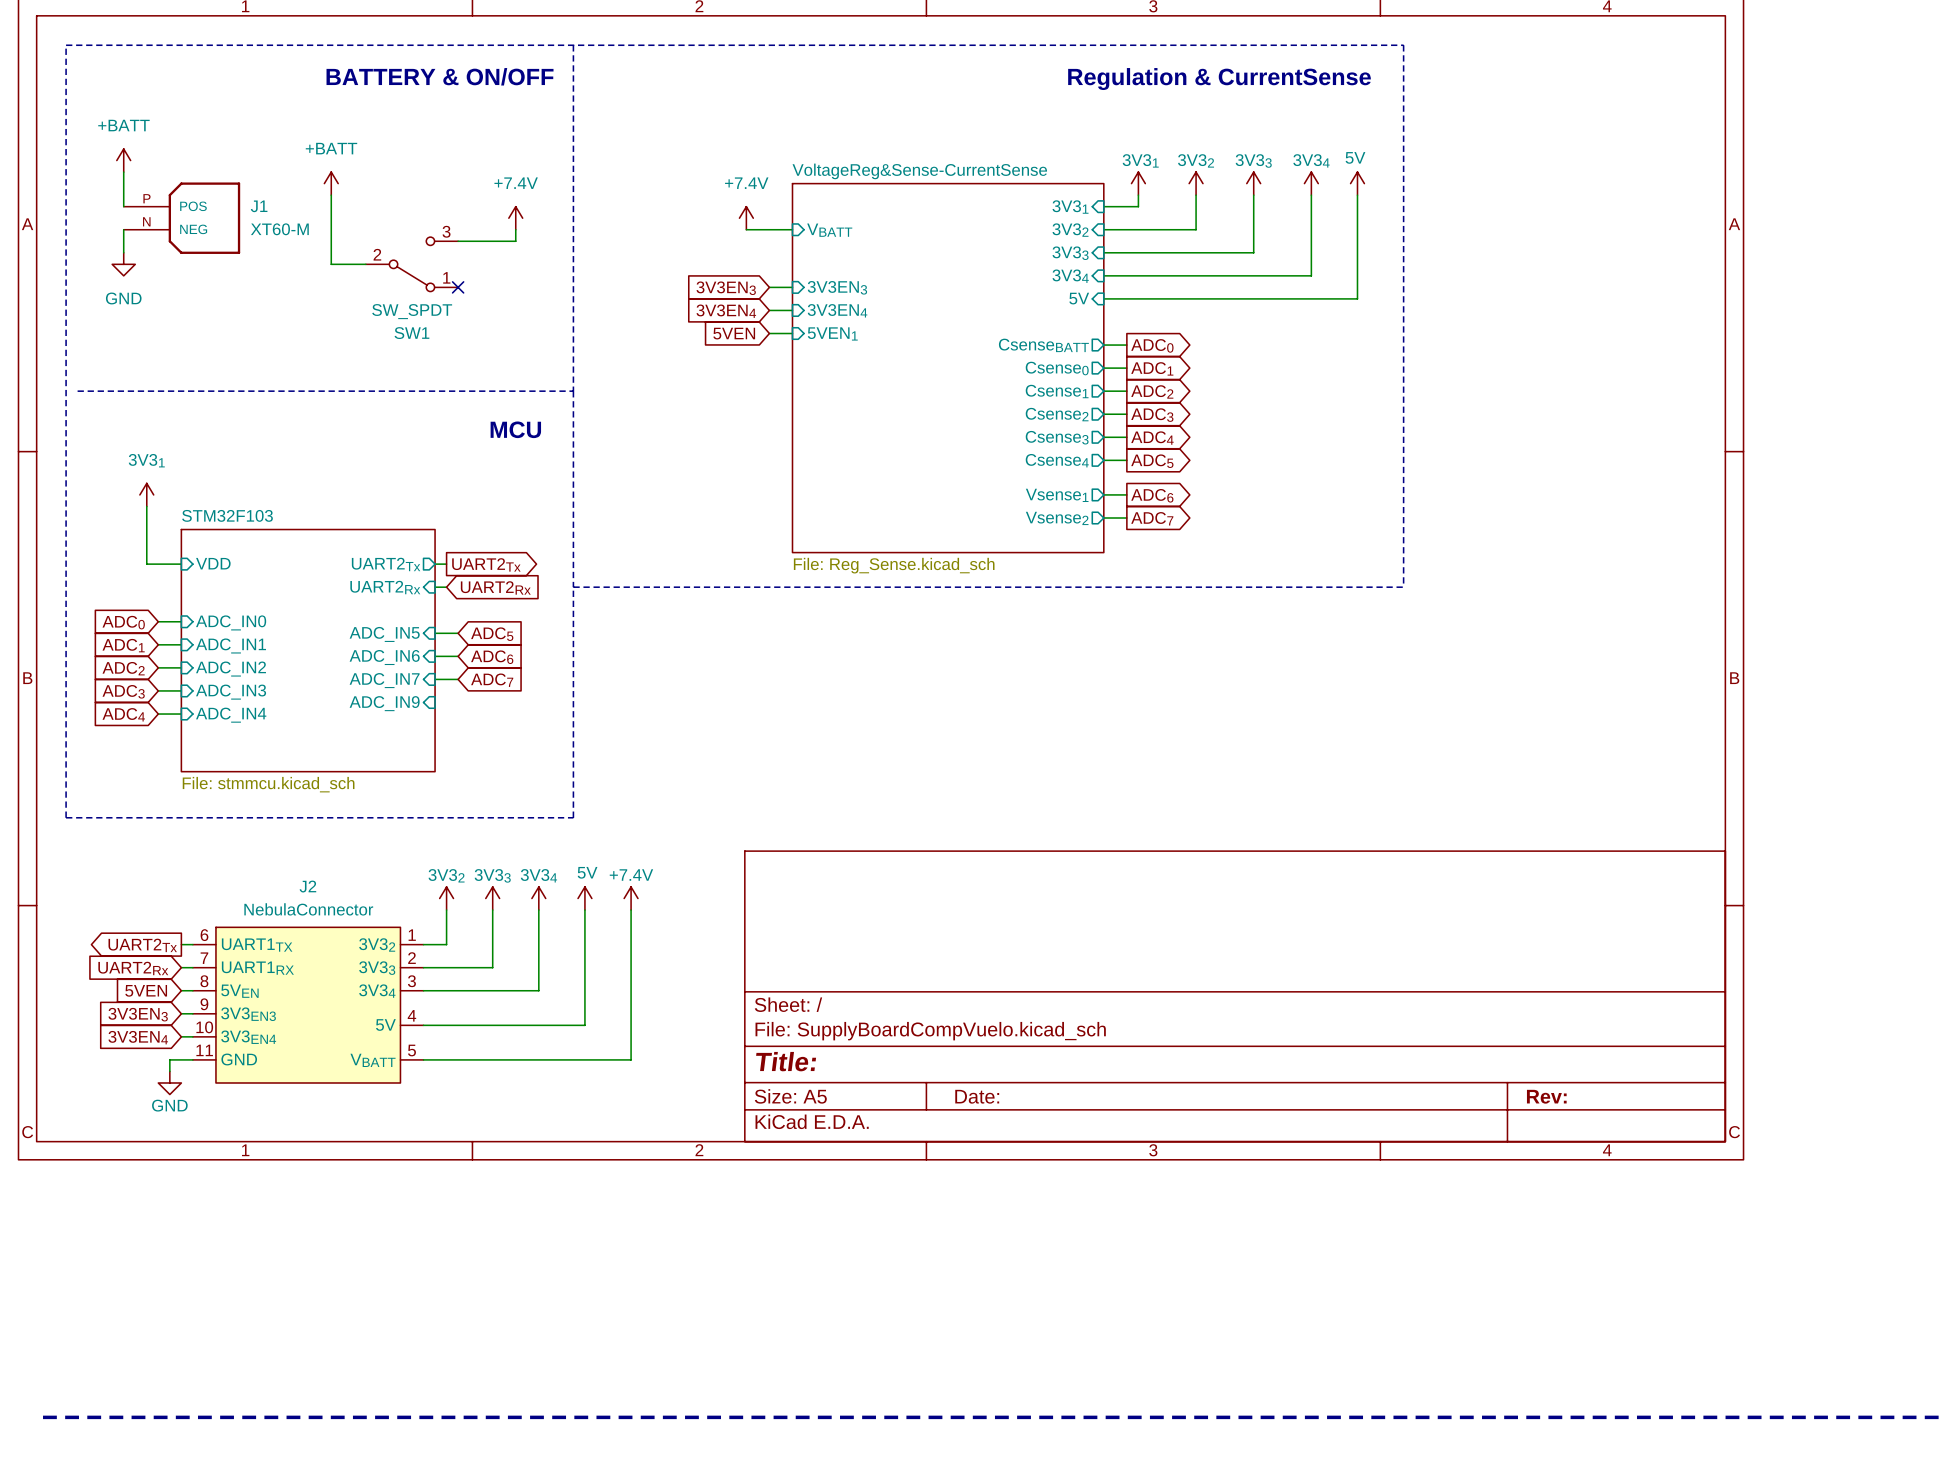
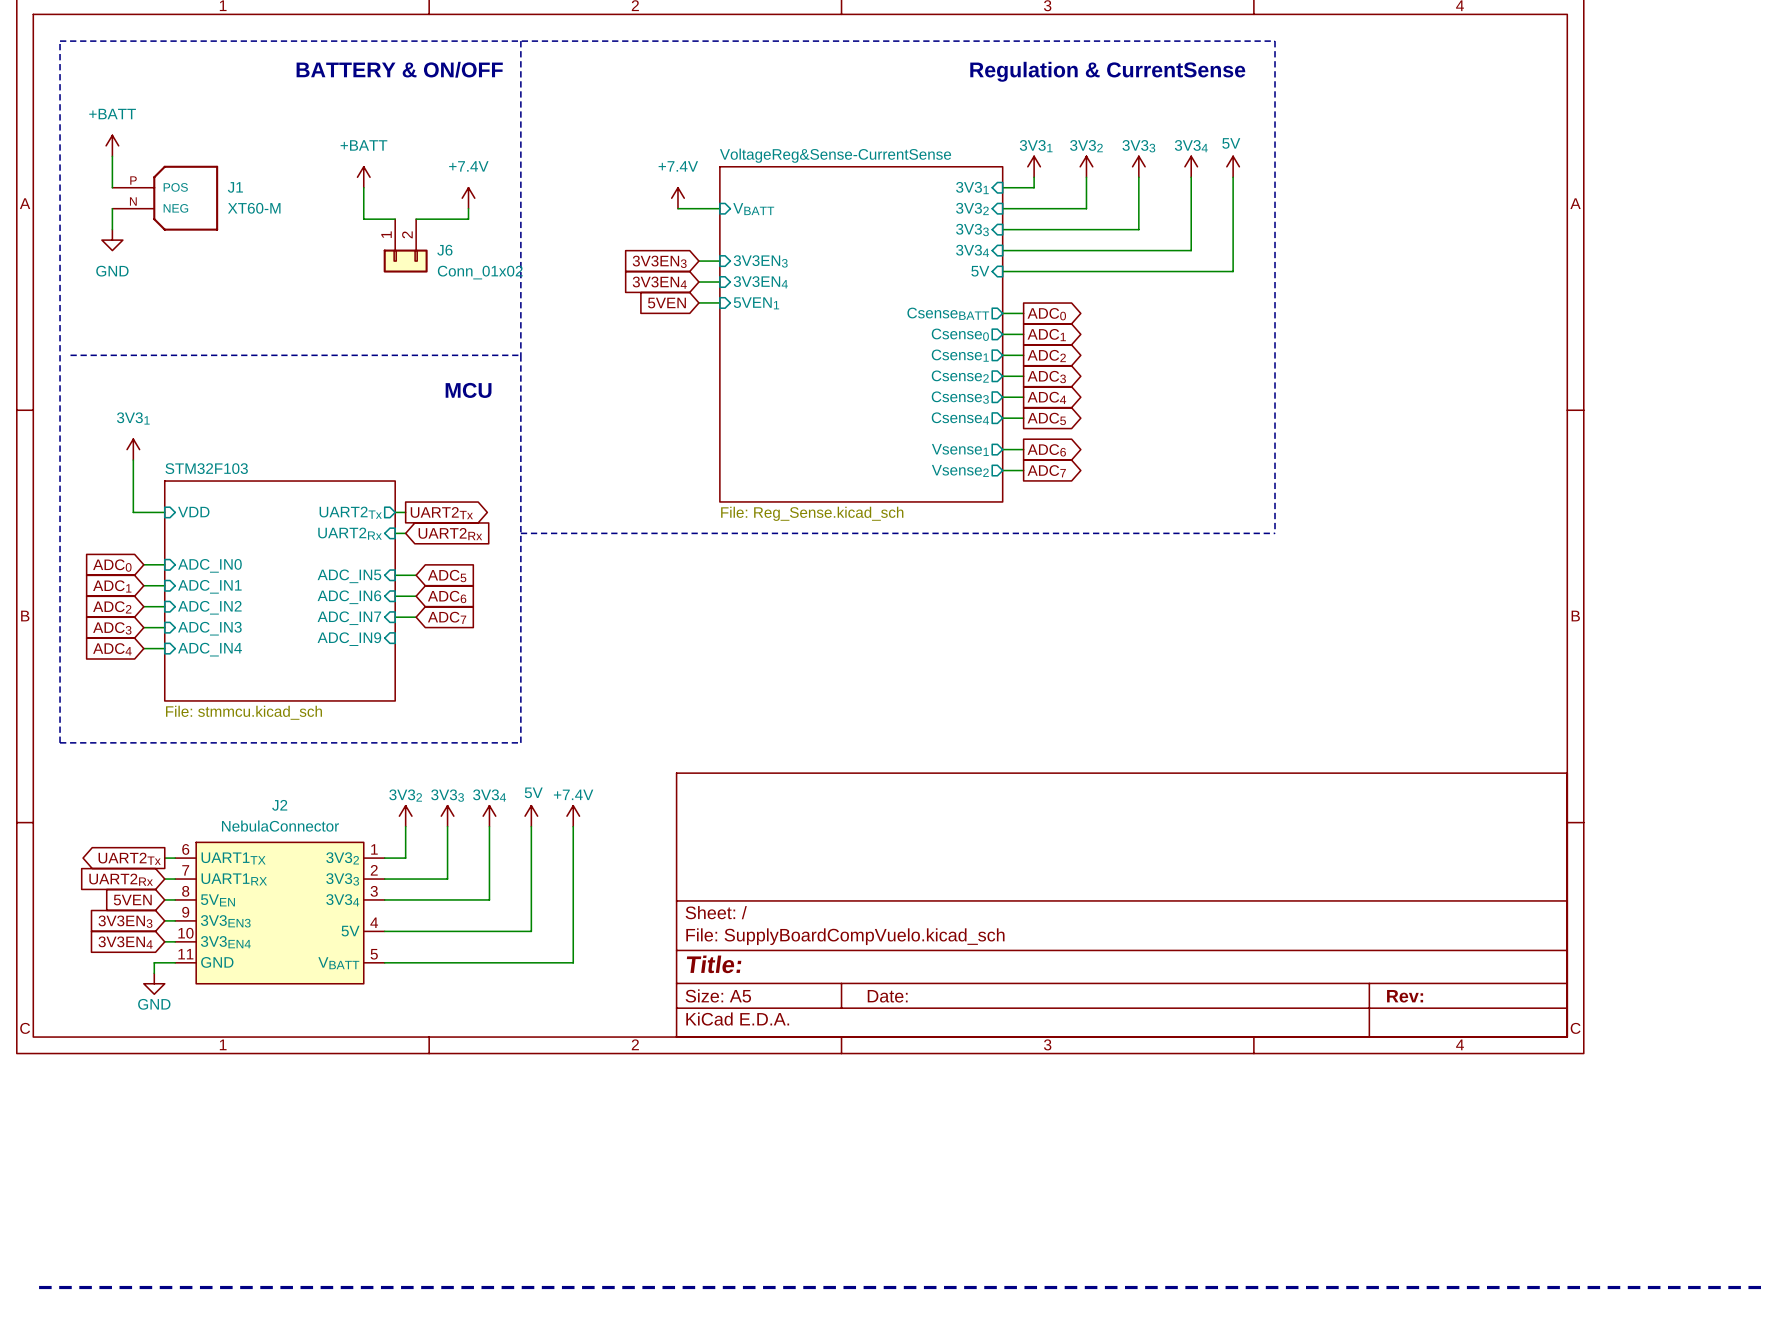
power symbol position: +BATT (331, 183) -> +BATT (363, 177)
wire: (331, 195) (331, 264) (365, 264) -> none
wire: none -> (363, 187) (363, 219) (395, 219)
SW1: SW_SPDT (411, 264) -> none
J6: none -> Conn_01x02 (405, 245)
no-connect mark: (458, 287) -> none

